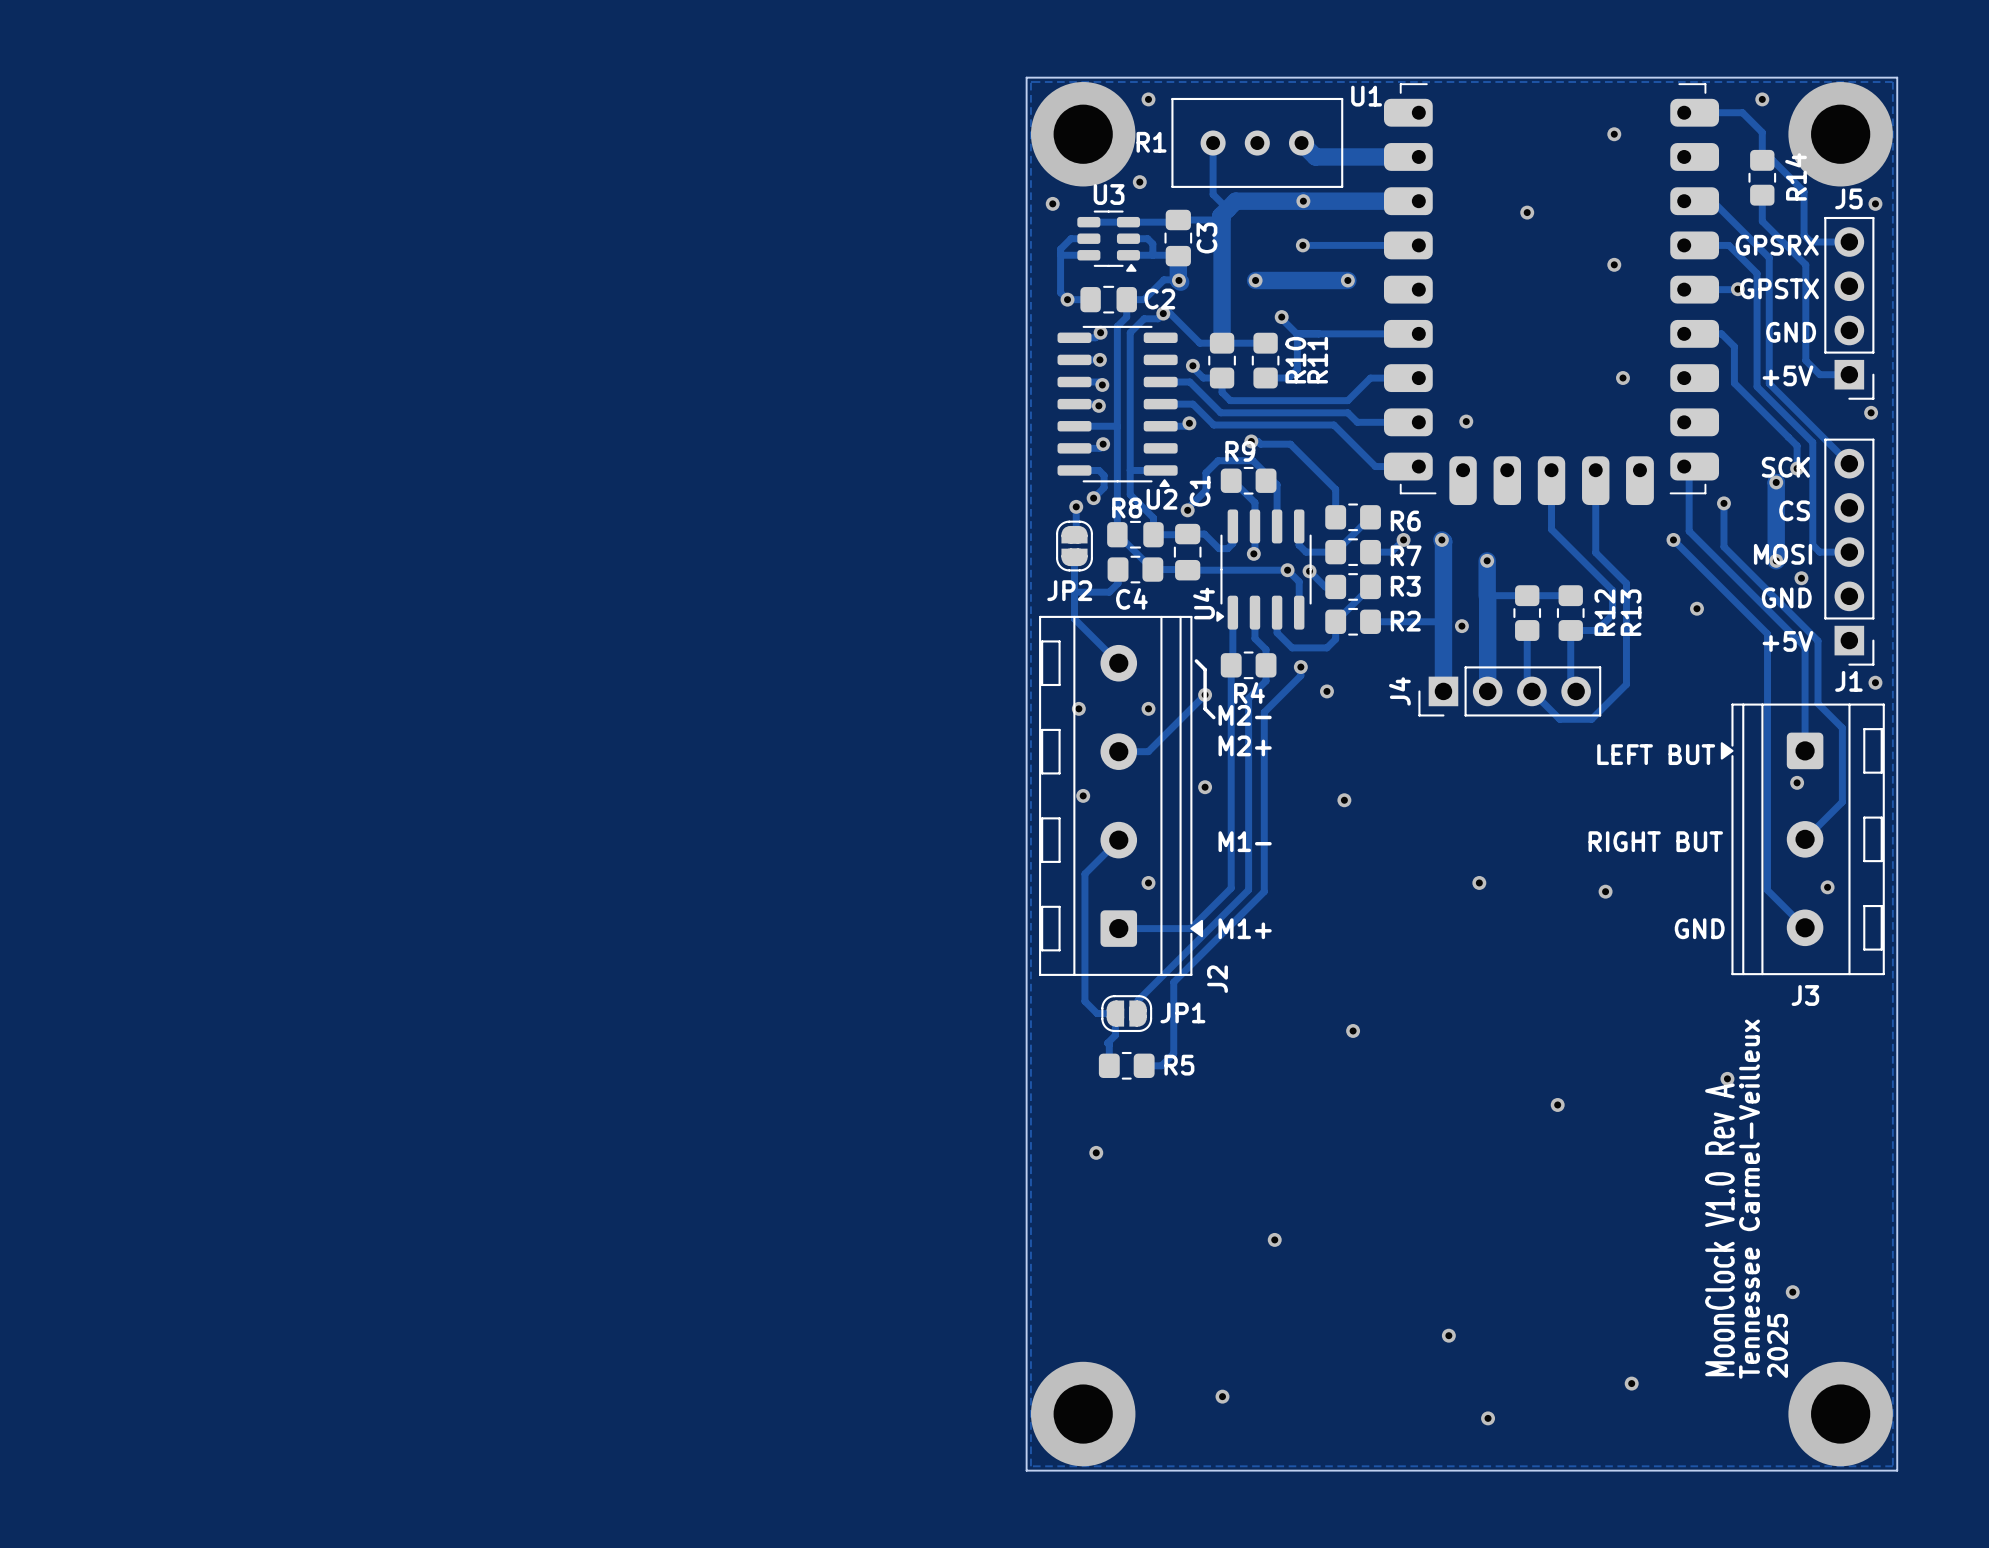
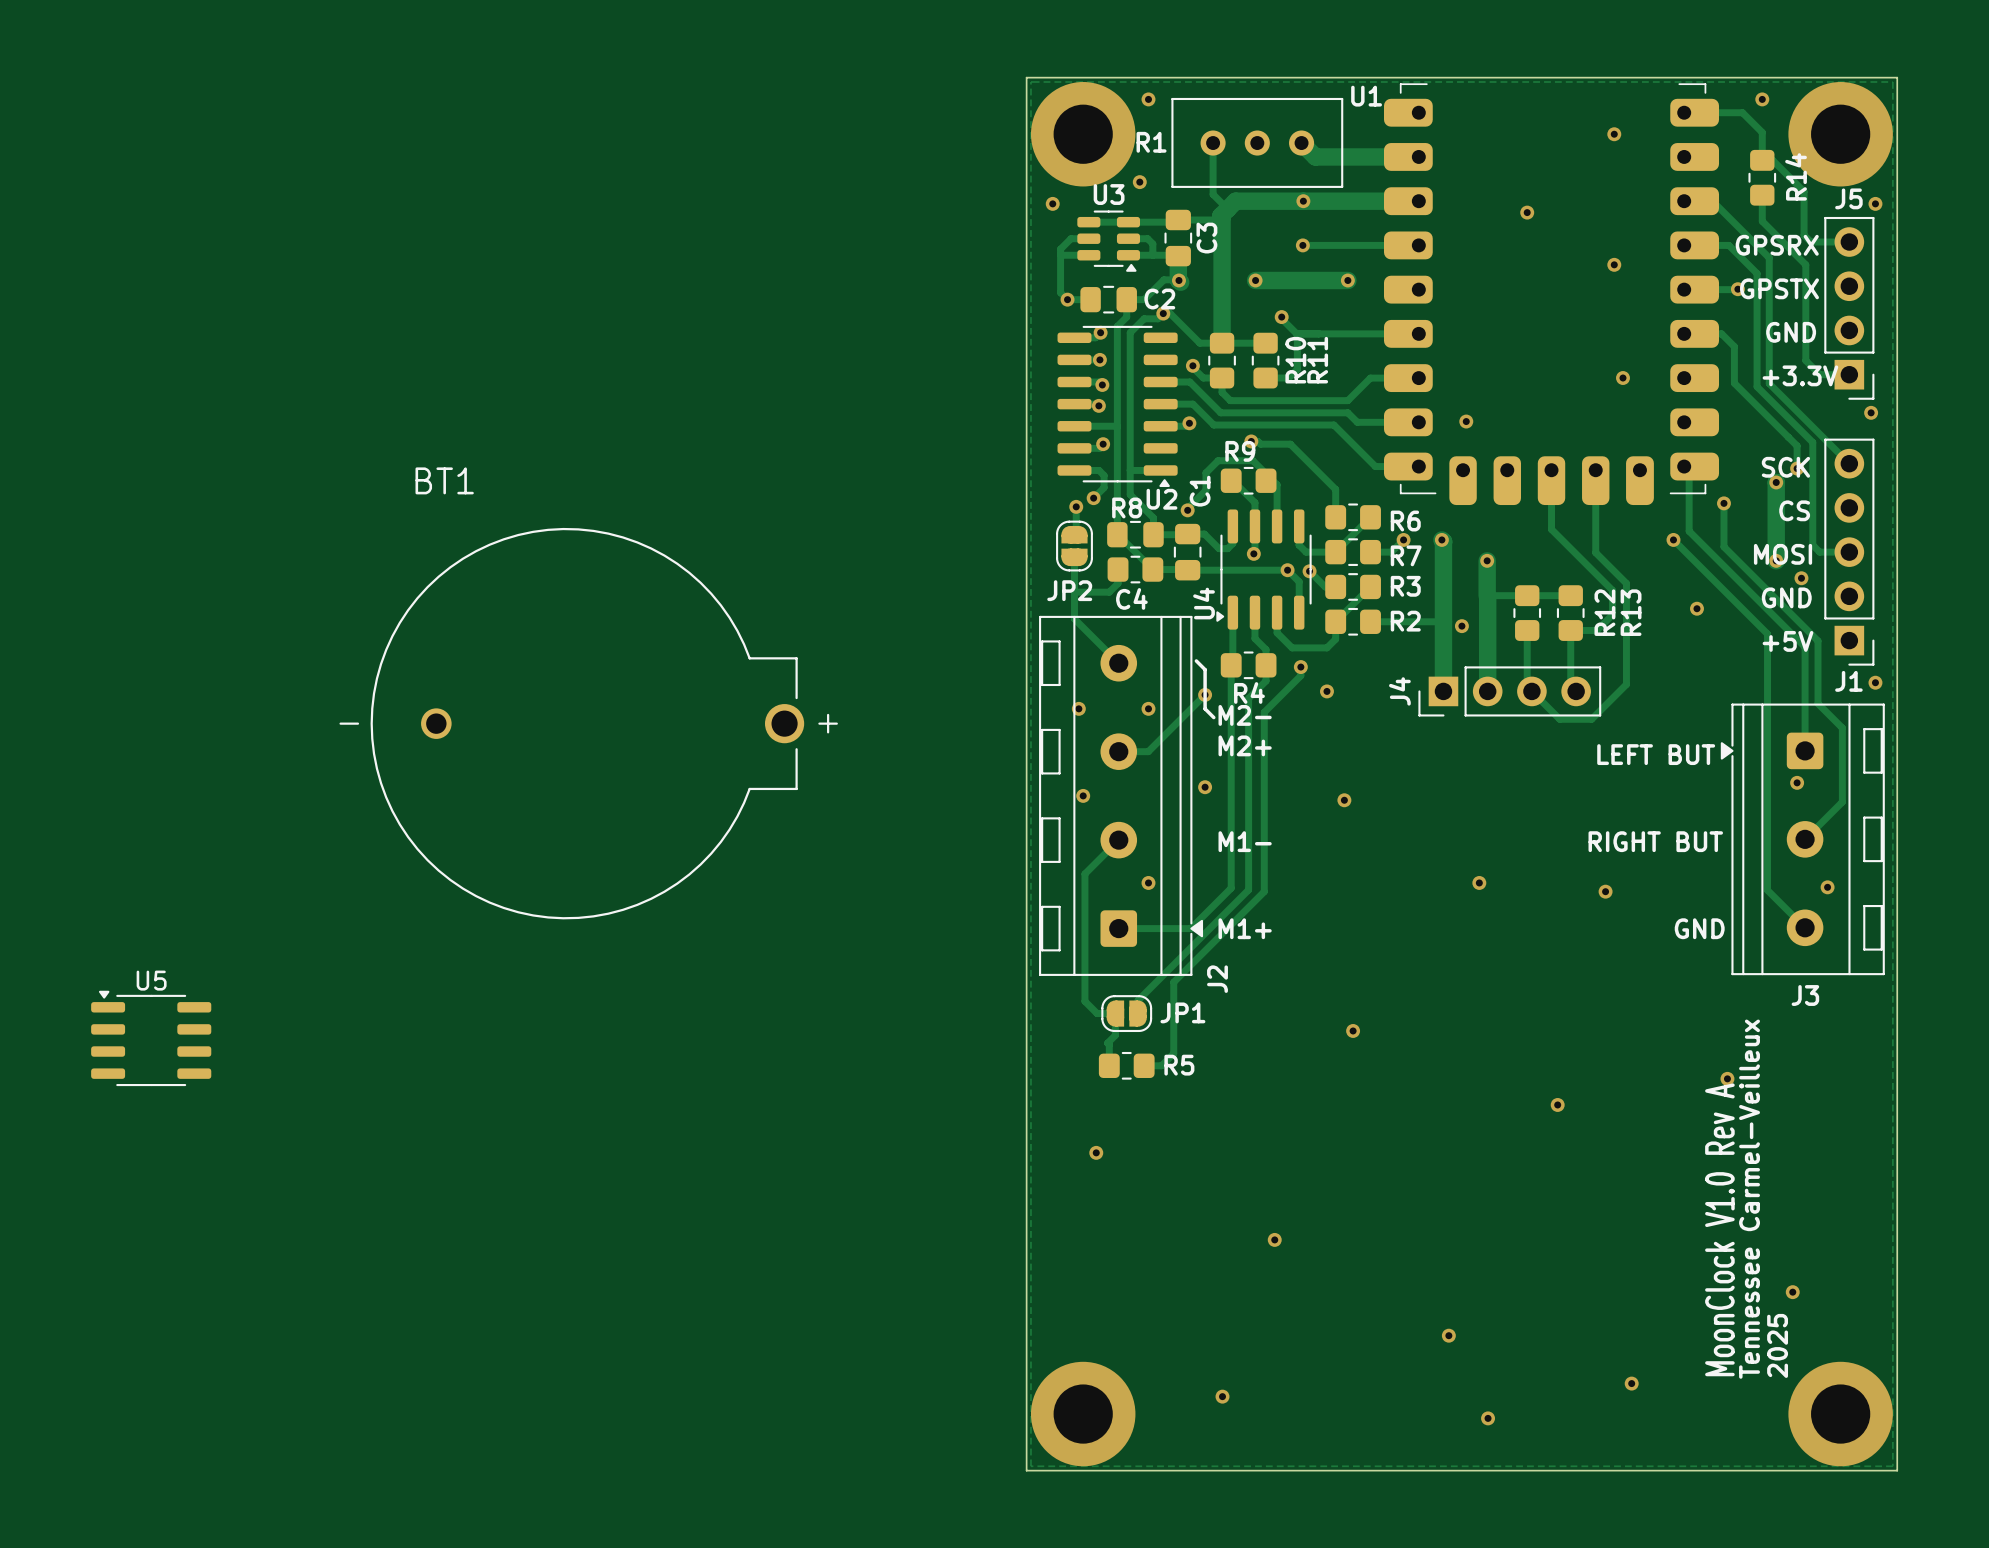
text: +5V (1788, 375) -> +3.3V (1800, 375)
BT1: none -> (588, 723)
U5: none -> (151, 1038)

